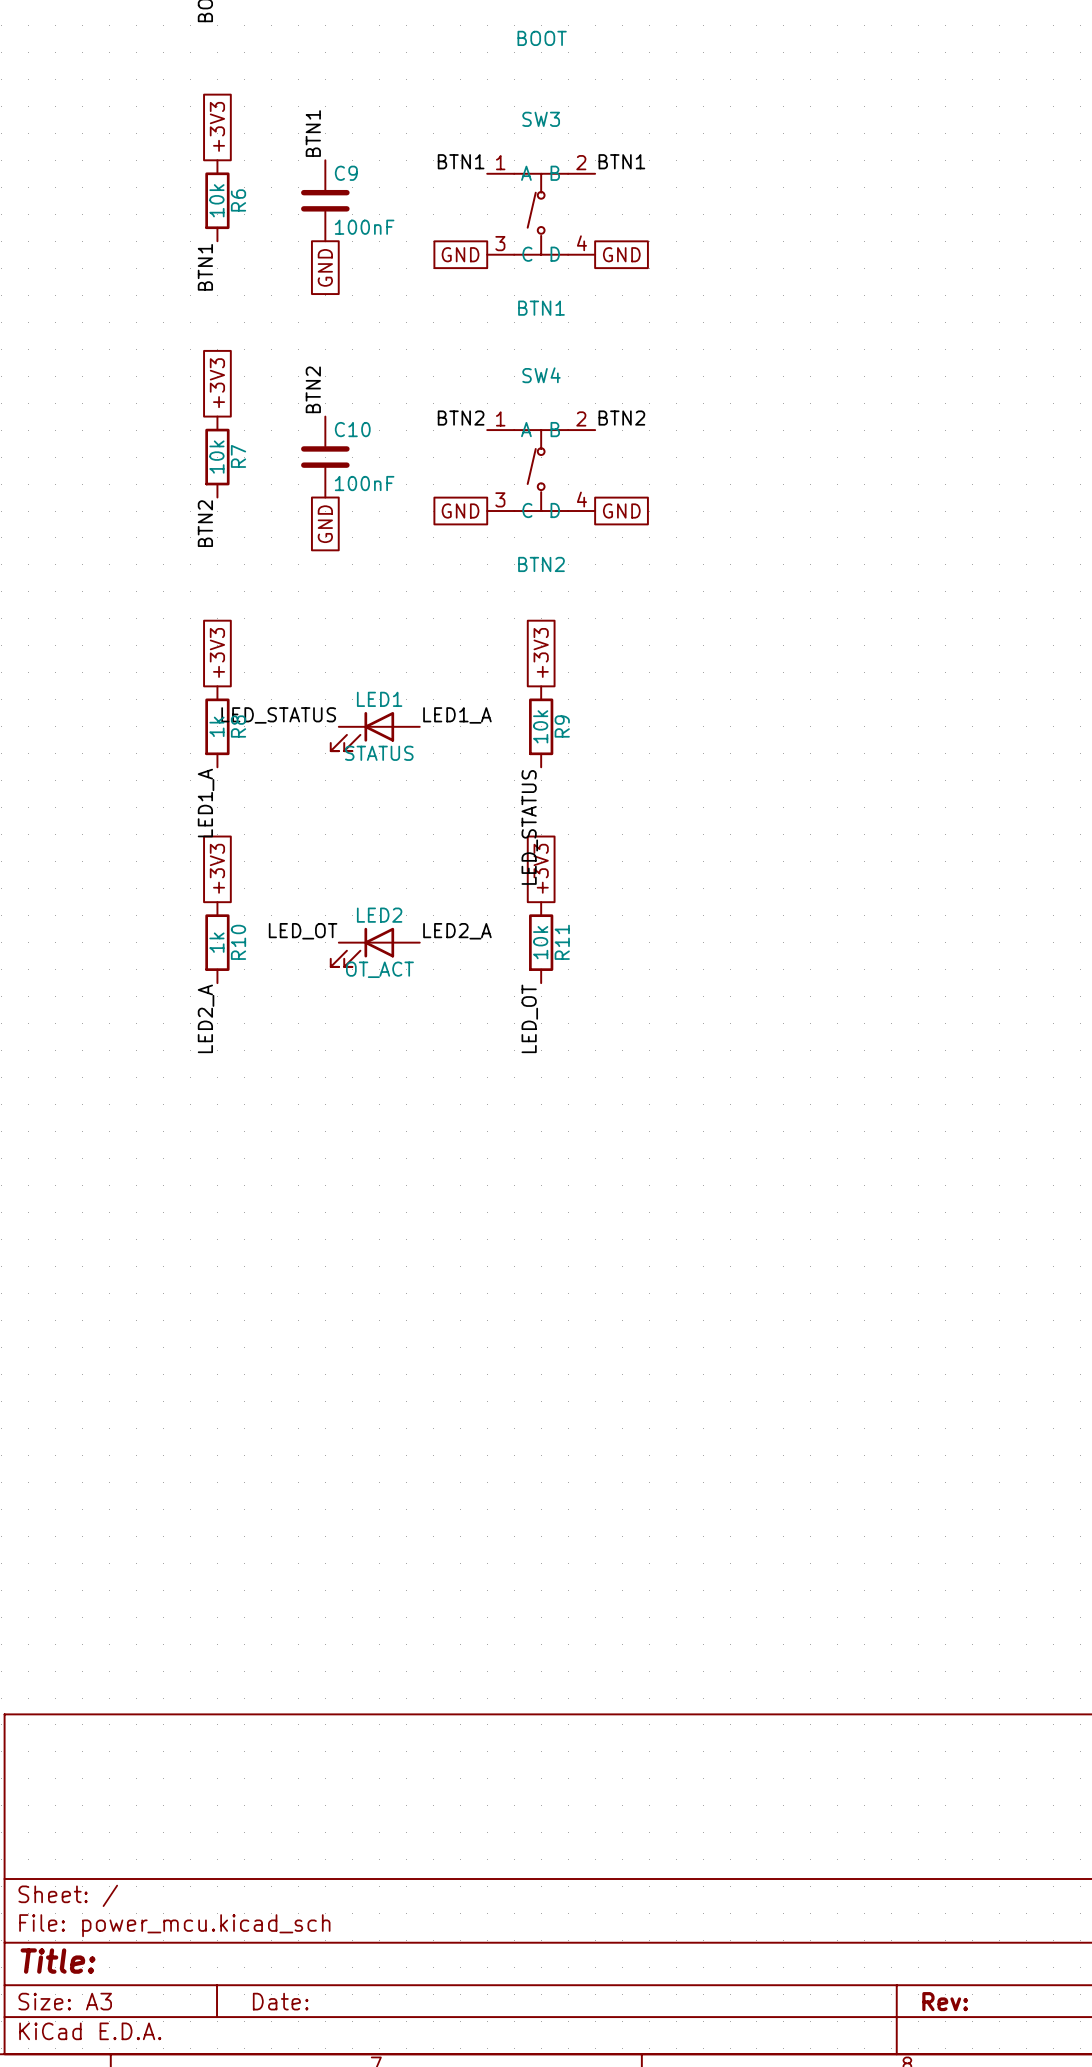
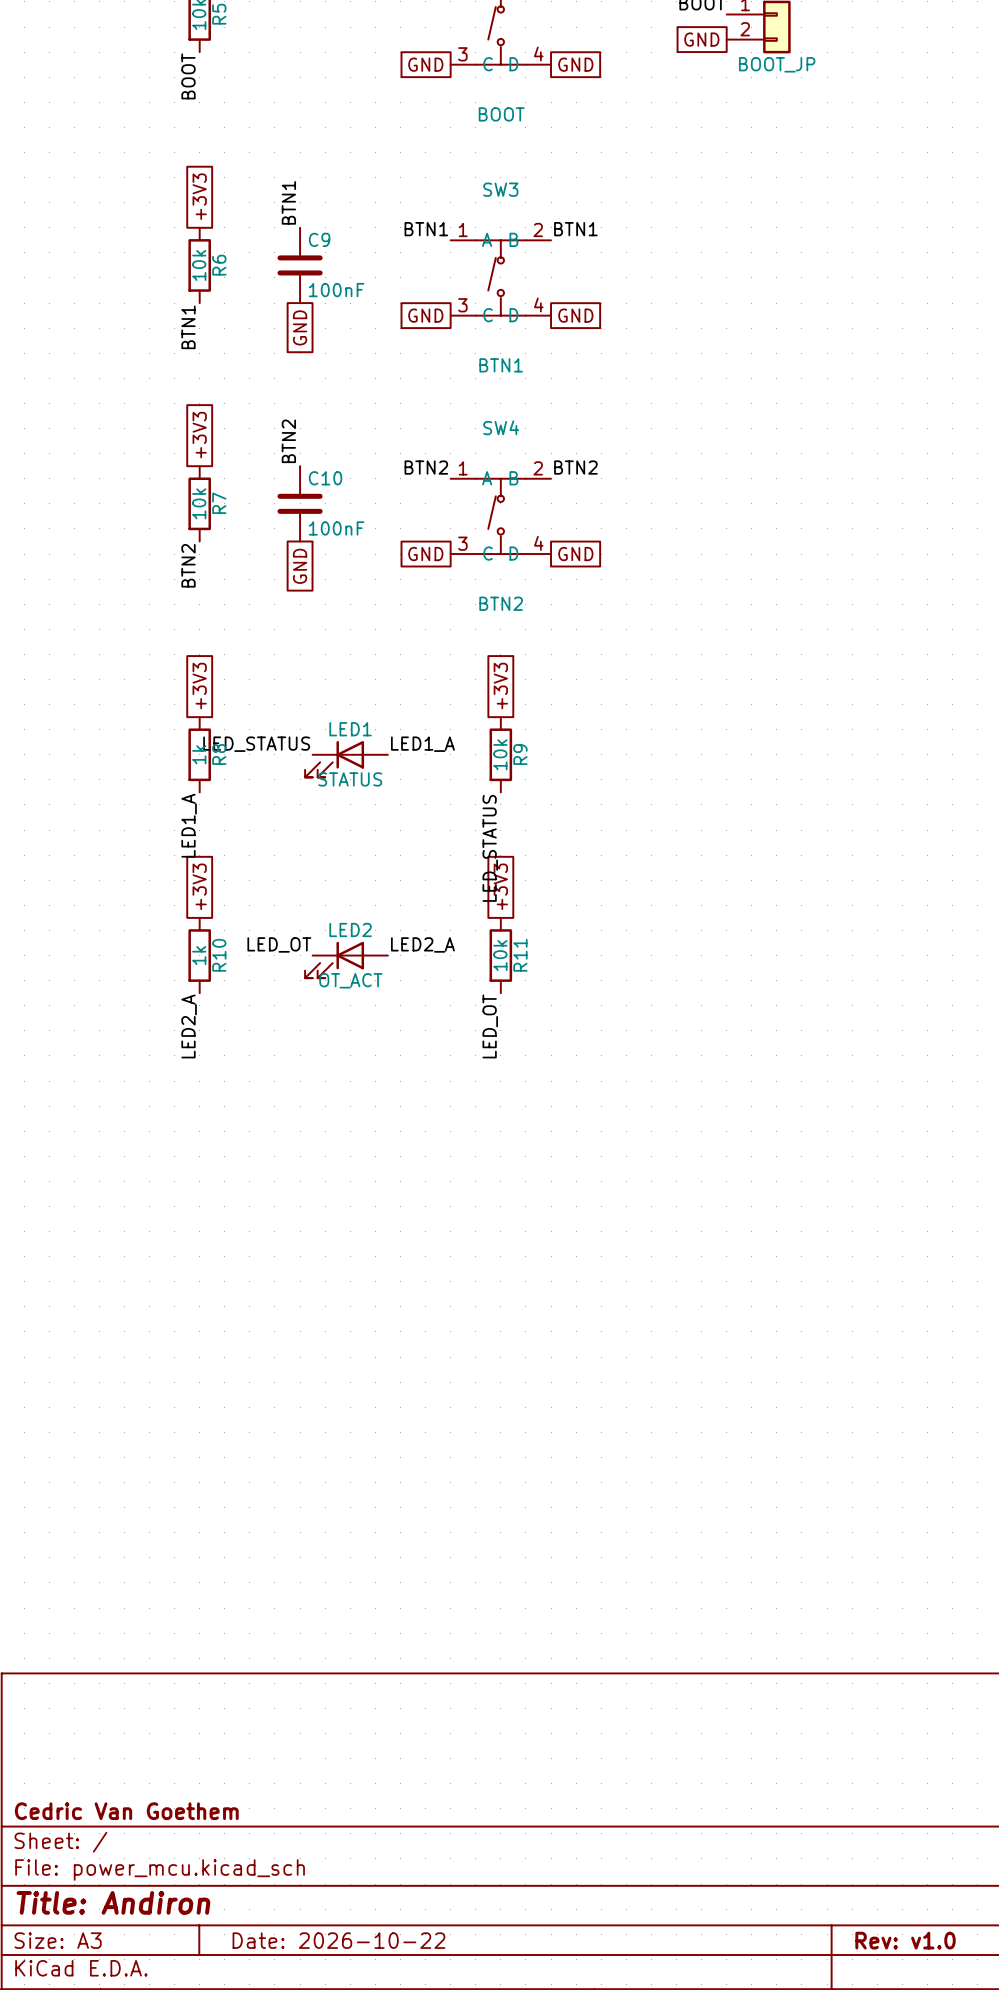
title block: none -> Cedric Van Goethem (126, 1811)
title block: Title: (58, 1961) -> Title: Andiron (113, 1902)
title block: Date: (280, 2001) -> Date: 2026-10-22 (338, 1940)
title block: Rev: (945, 2001) -> Rev: v1.0 (905, 1940)

